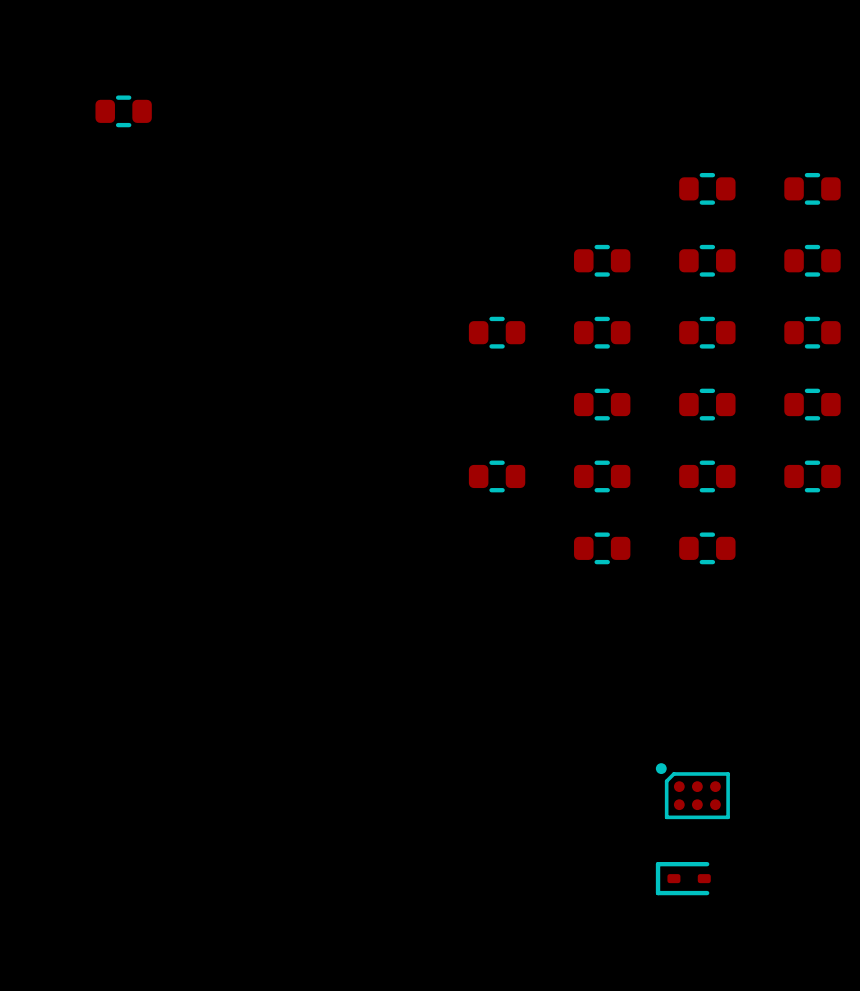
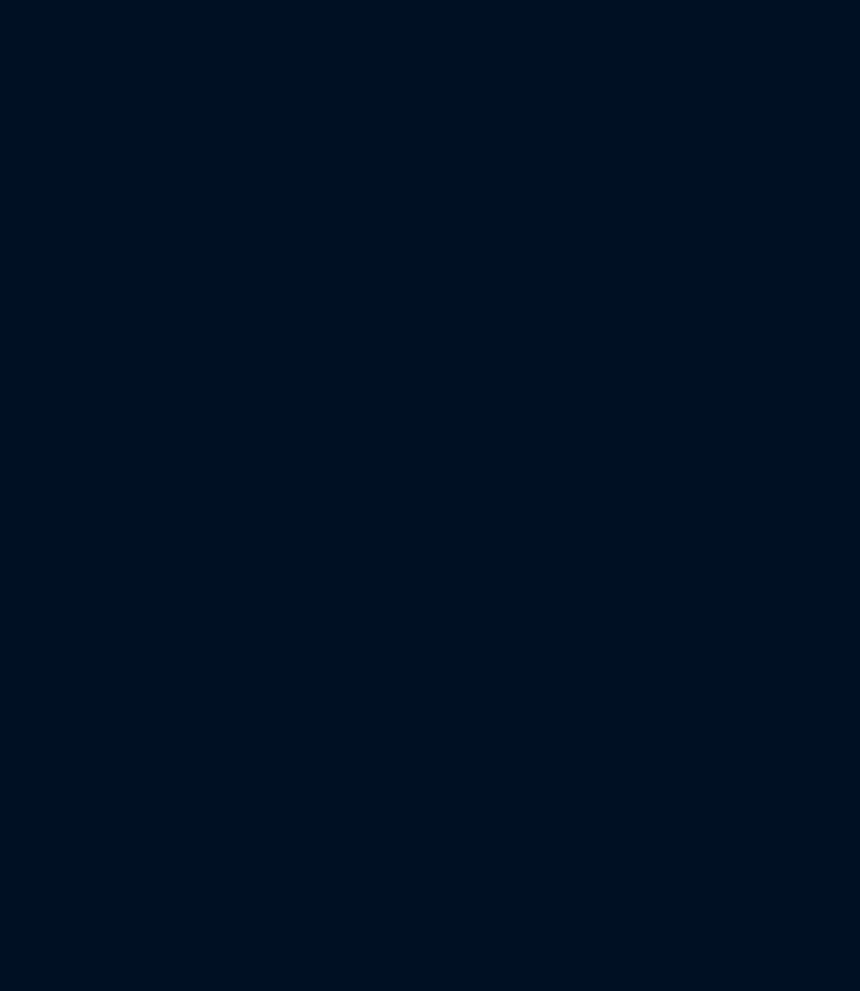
part: (123, 111) -> none
part: (707, 188) -> none
part: (812, 188) -> none
part: (602, 260) -> none
part: (707, 260) -> none
part: (812, 260) -> none
part: (497, 332) -> none
part: (602, 332) -> none
part: (707, 332) -> none
part: (812, 332) -> none
part: (602, 404) -> none
part: (707, 404) -> none
part: (812, 404) -> none
part: (497, 476) -> none
part: (602, 476) -> none
part: (707, 476) -> none
part: (812, 476) -> none
part: (602, 548) -> none
part: (707, 548) -> none
part: (692, 791) -> none
part: (683, 878) -> none

